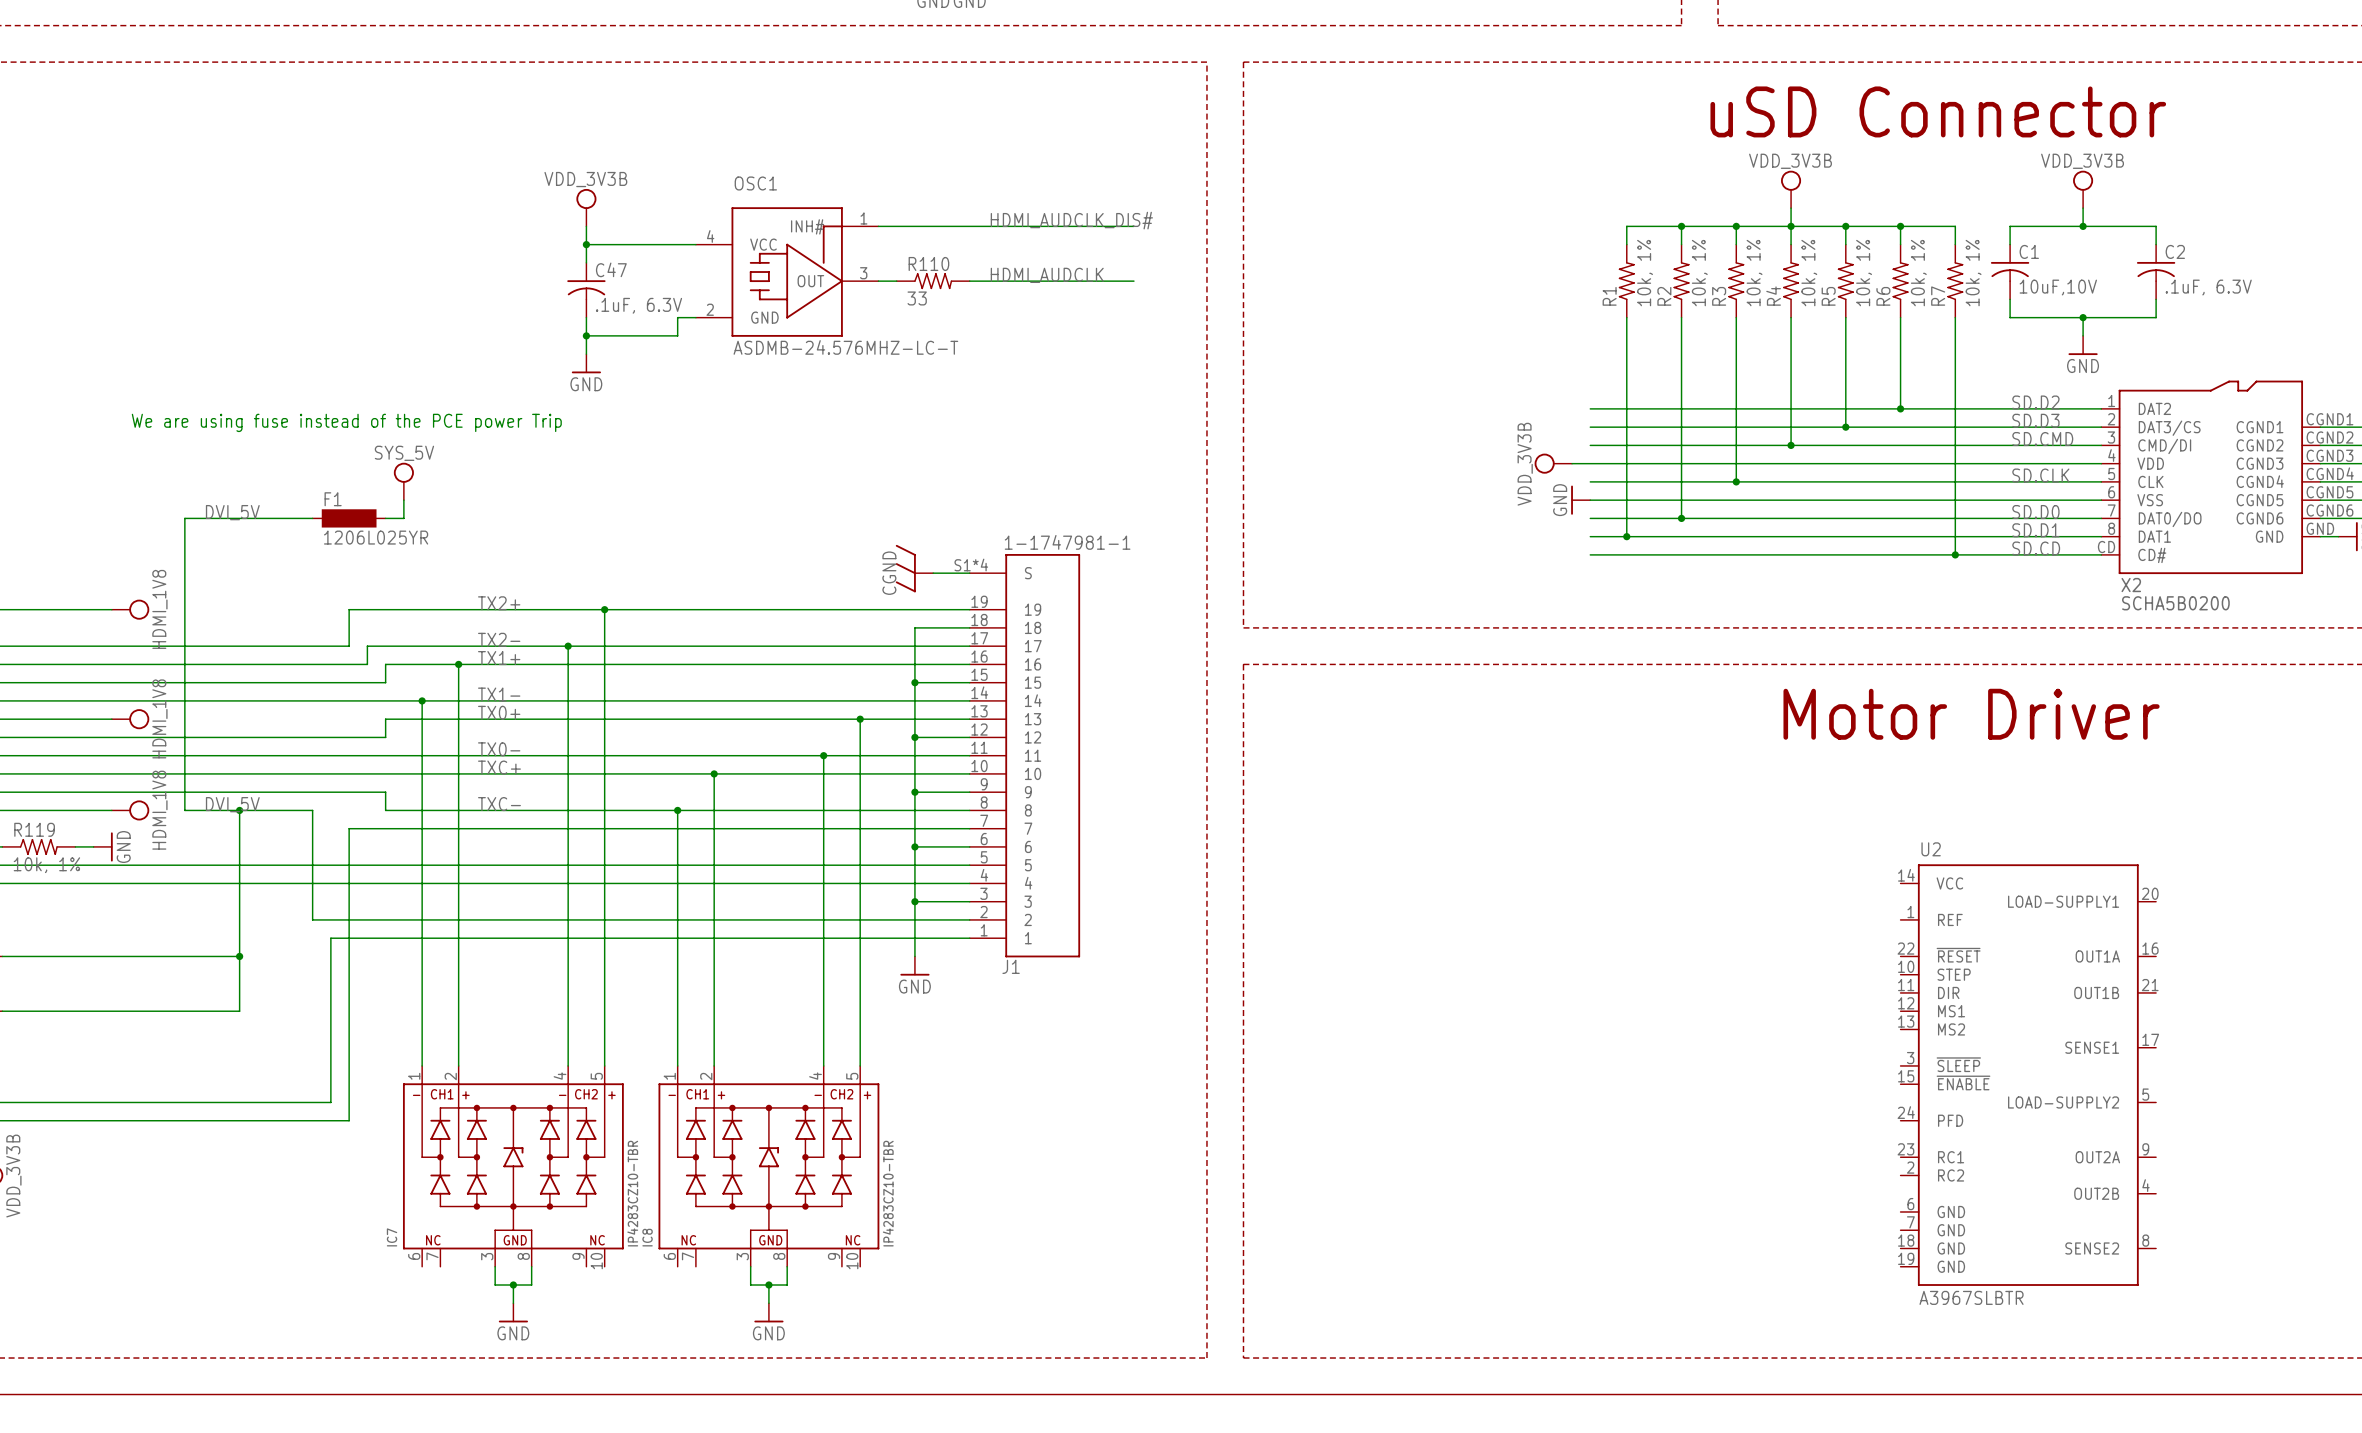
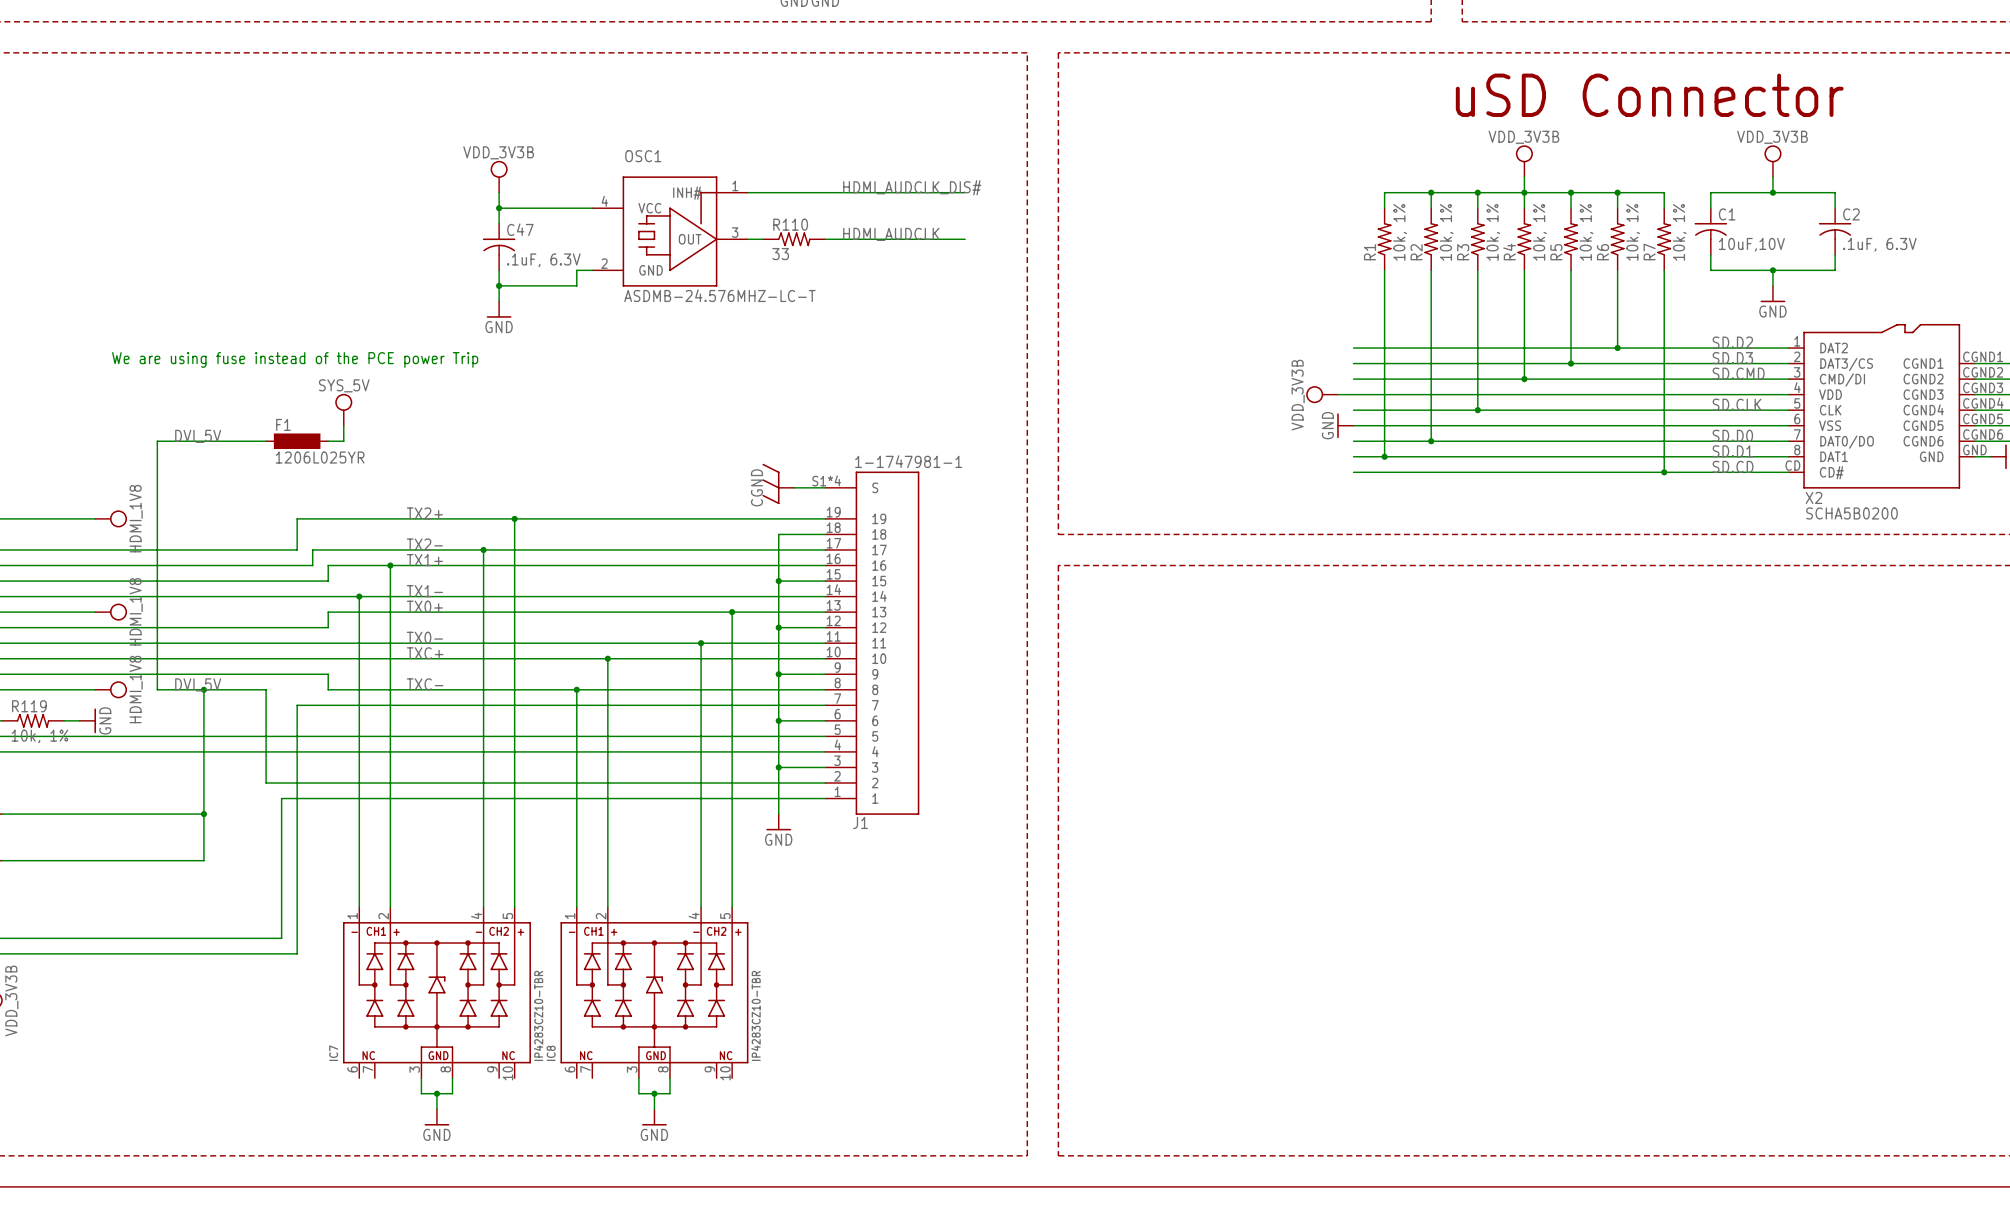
text: Motor Driver (1971, 714) -> none
U2: A3967SLBTR (2028, 1075) -> none

